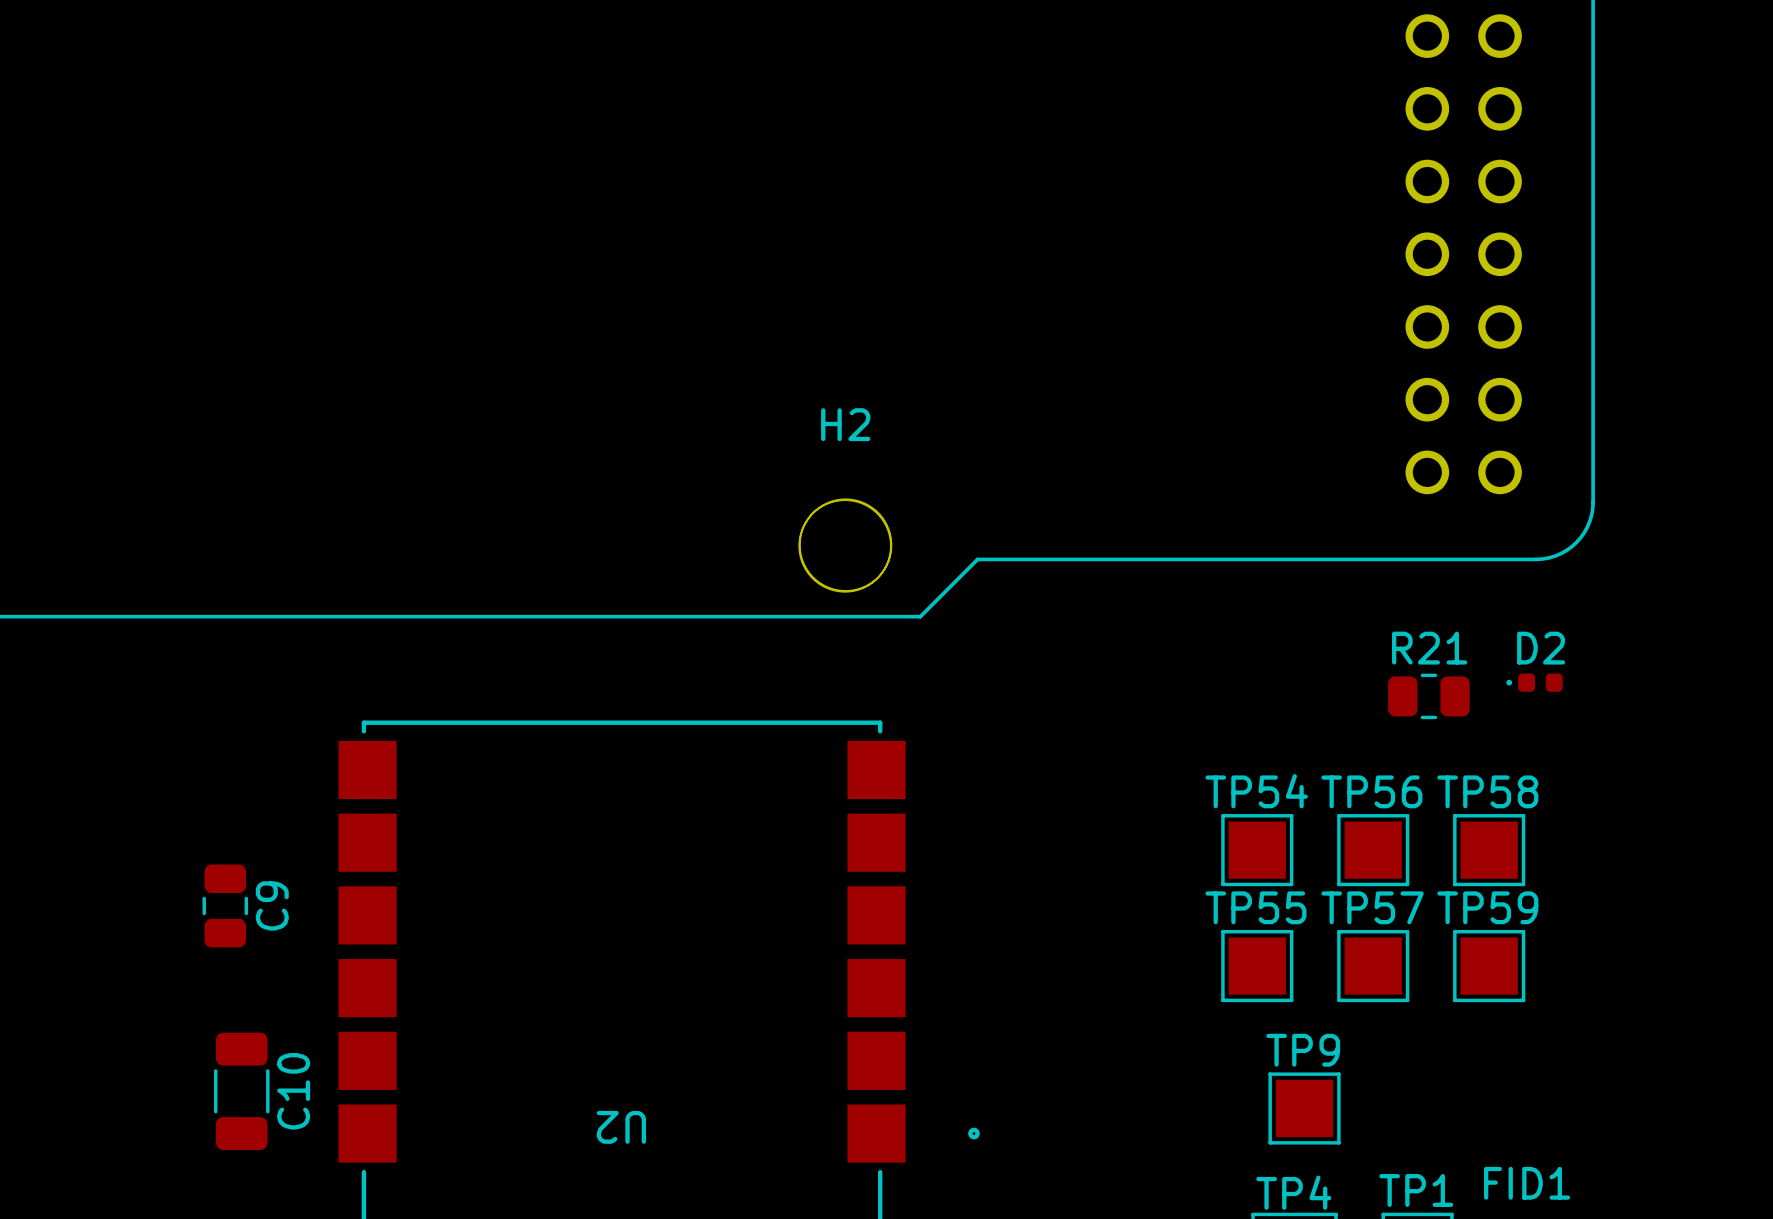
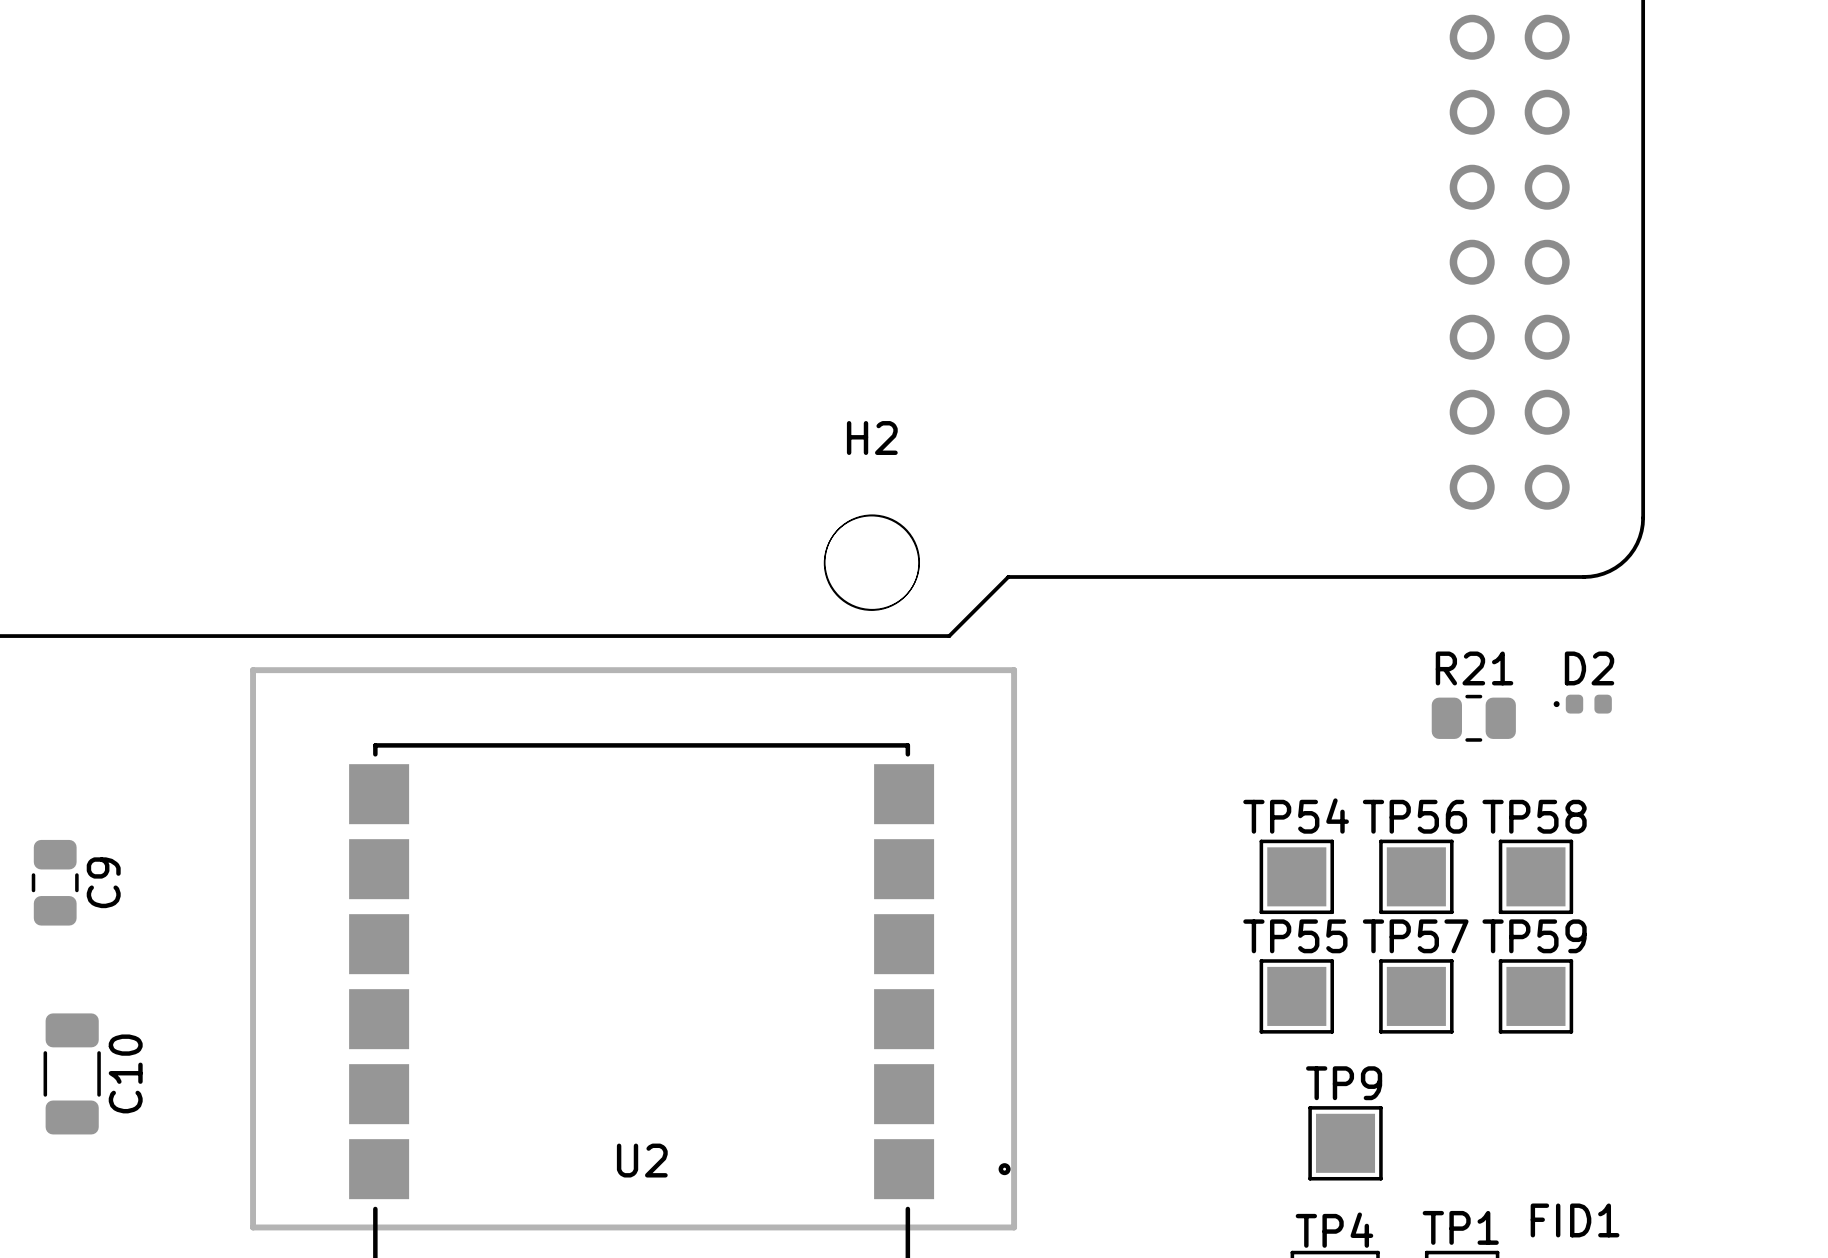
track: none -> (253, 670) (1014, 670) (1014, 1227) (253, 1227) (253, 670)
C9 position: (225, 905) -> (55, 882)
C10 position: (241, 1091) -> (72, 1073)
U2 name rotation: 0° (621, 1127) -> 180° (642, 1160)

